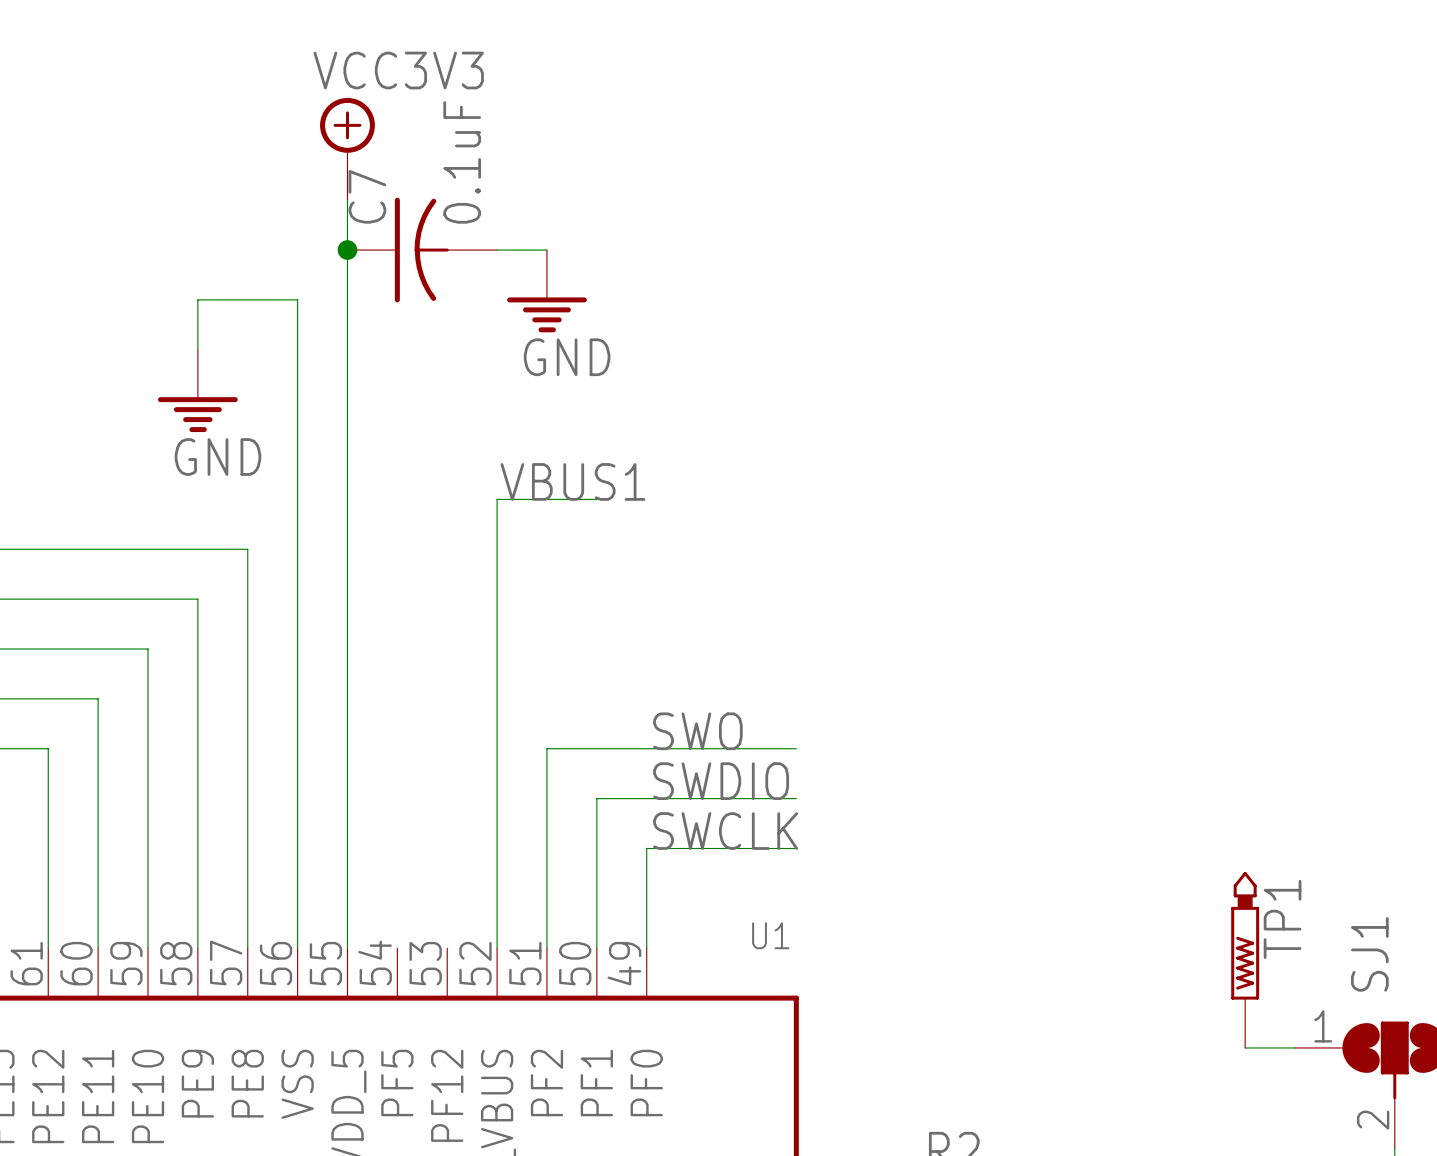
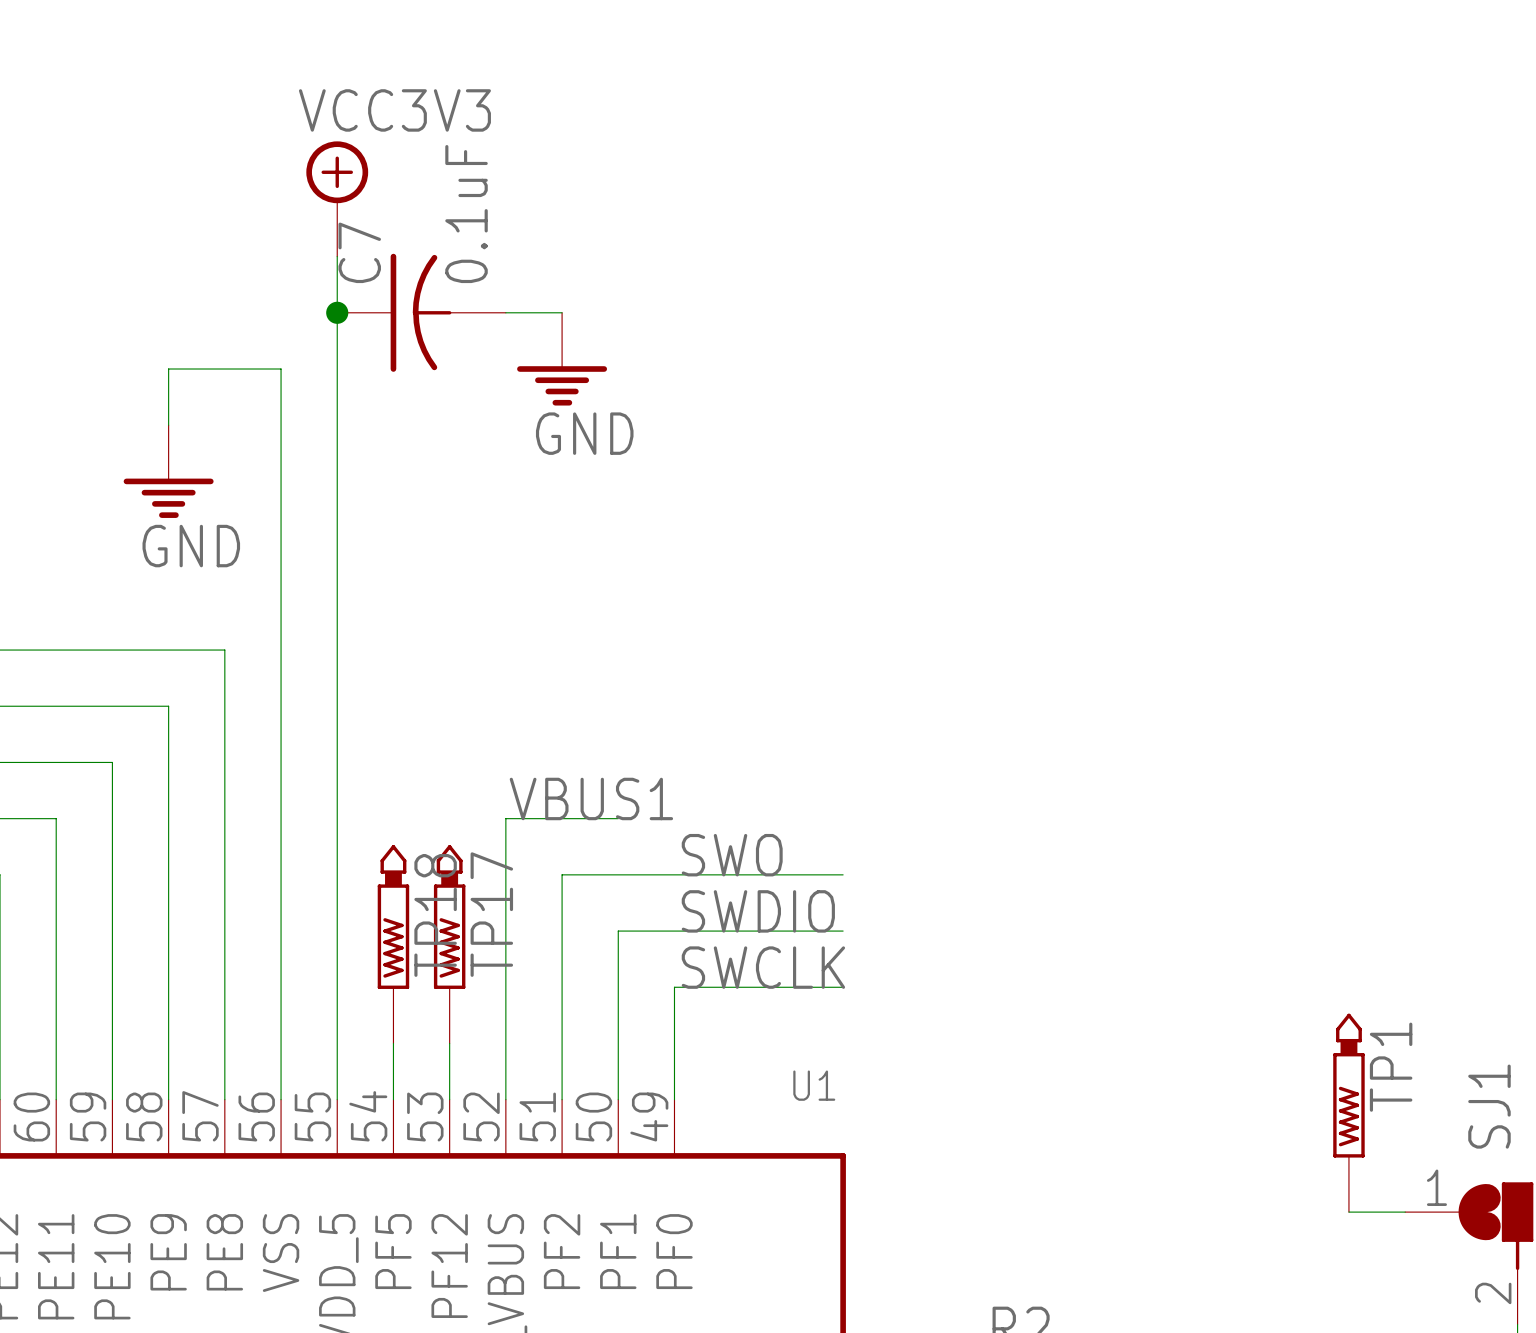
label position: VBUS1 (572, 481) -> VBUS1 (591, 798)
wire: (596, 499) (497, 499) (497, 698) -> (618, 818) (505, 818)
TP18: none -> (393, 944)
TP17: none -> (449, 944)
wire: none -> (393, 1043) (393, 1099)
wire: none -> (449, 1043) (449, 1099)

